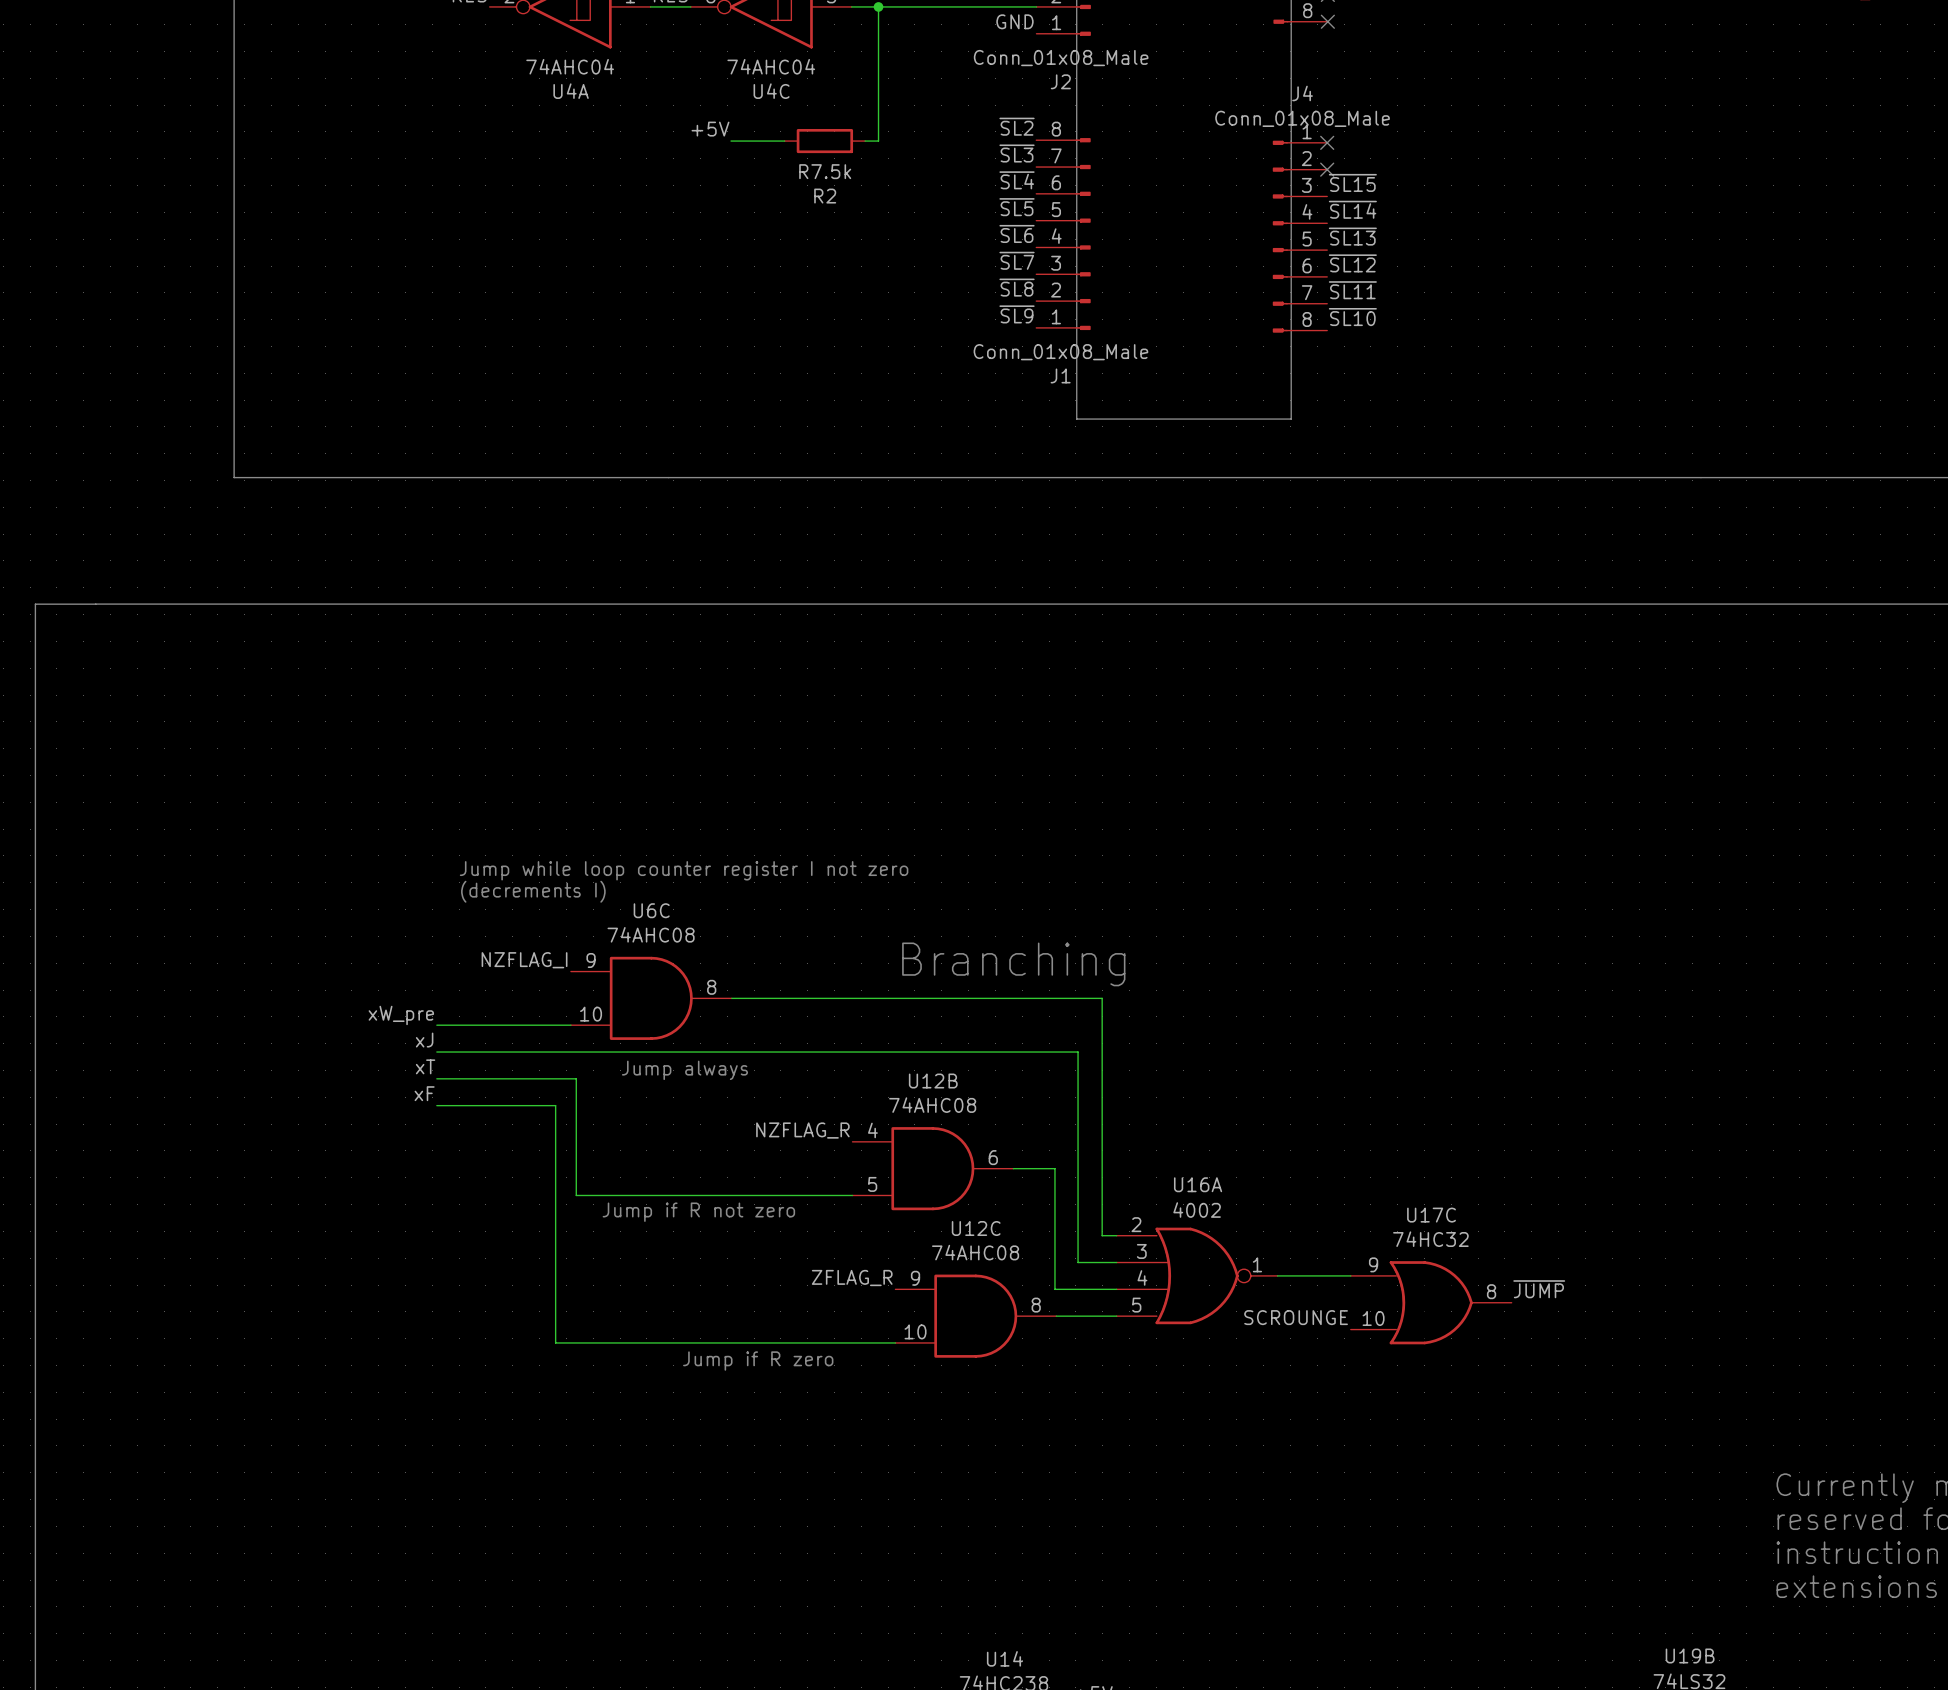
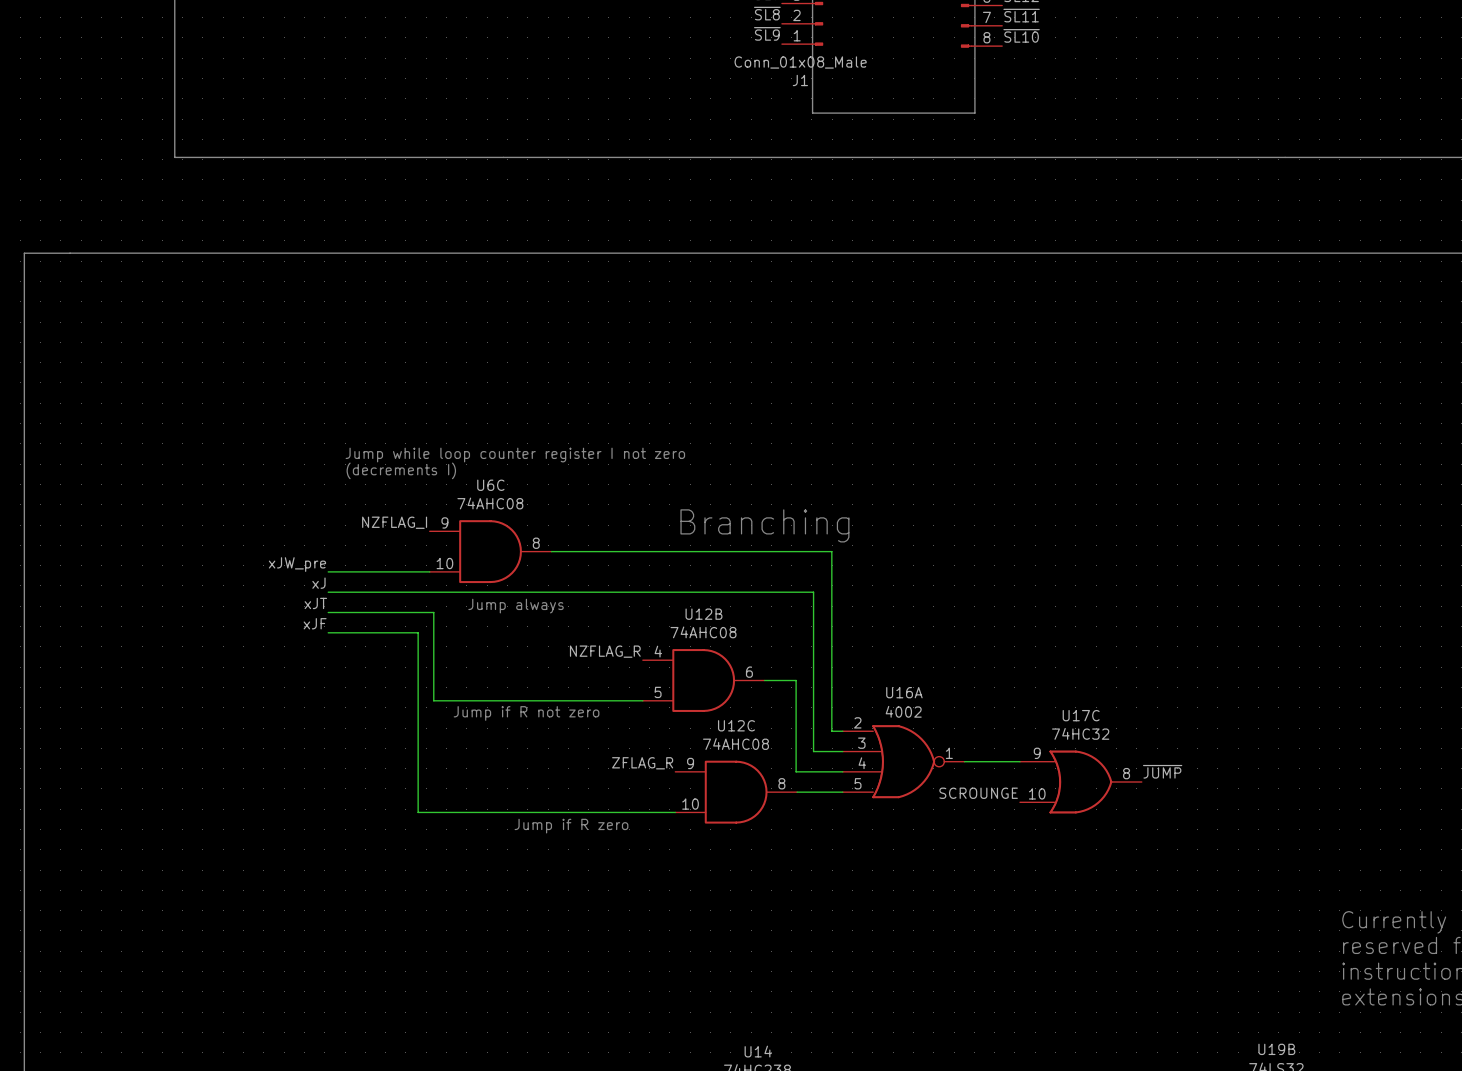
label: xW_pre (401, 1015) -> xJW_pre (297, 564)
label: xT (425, 1066) -> xJT (315, 603)
label: xF (424, 1093) -> xJF (315, 623)

